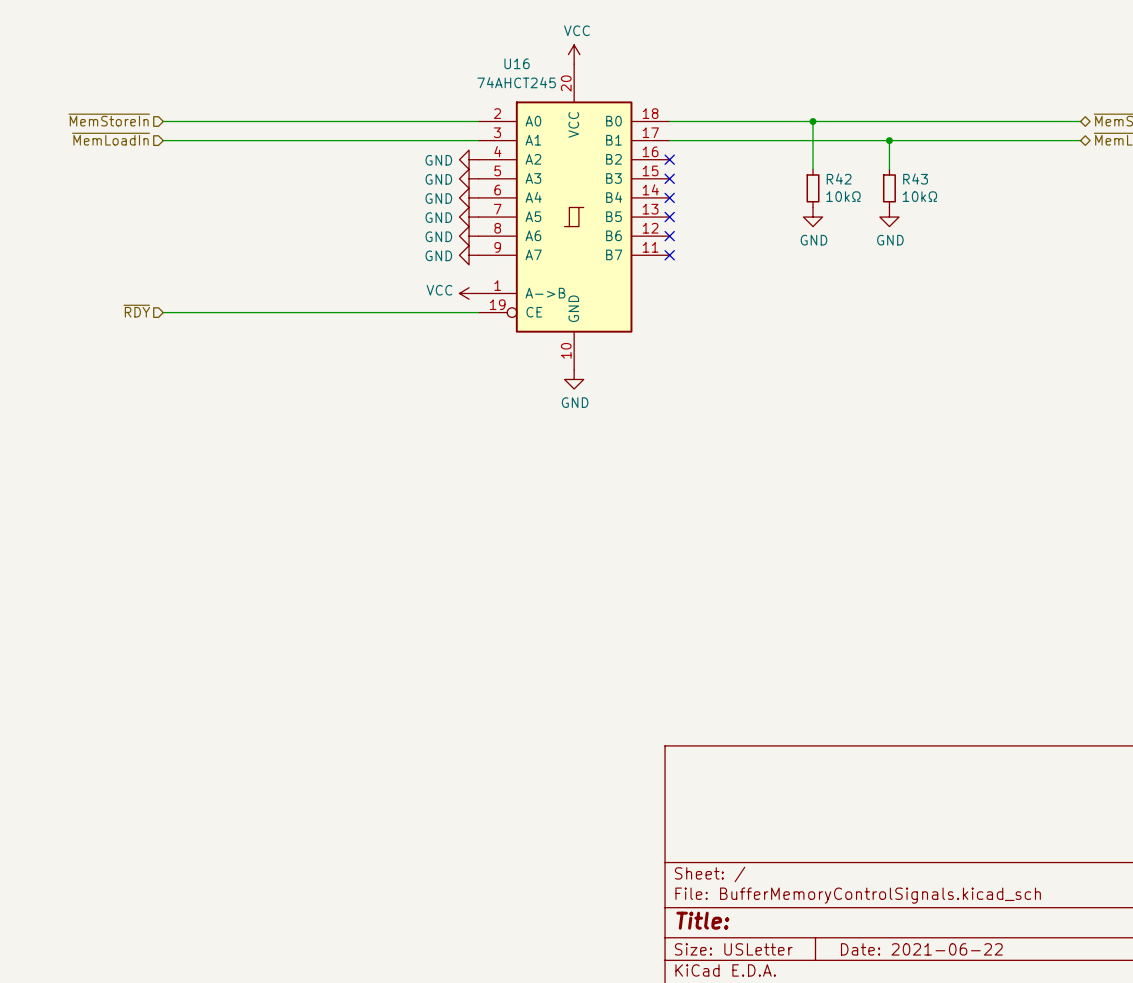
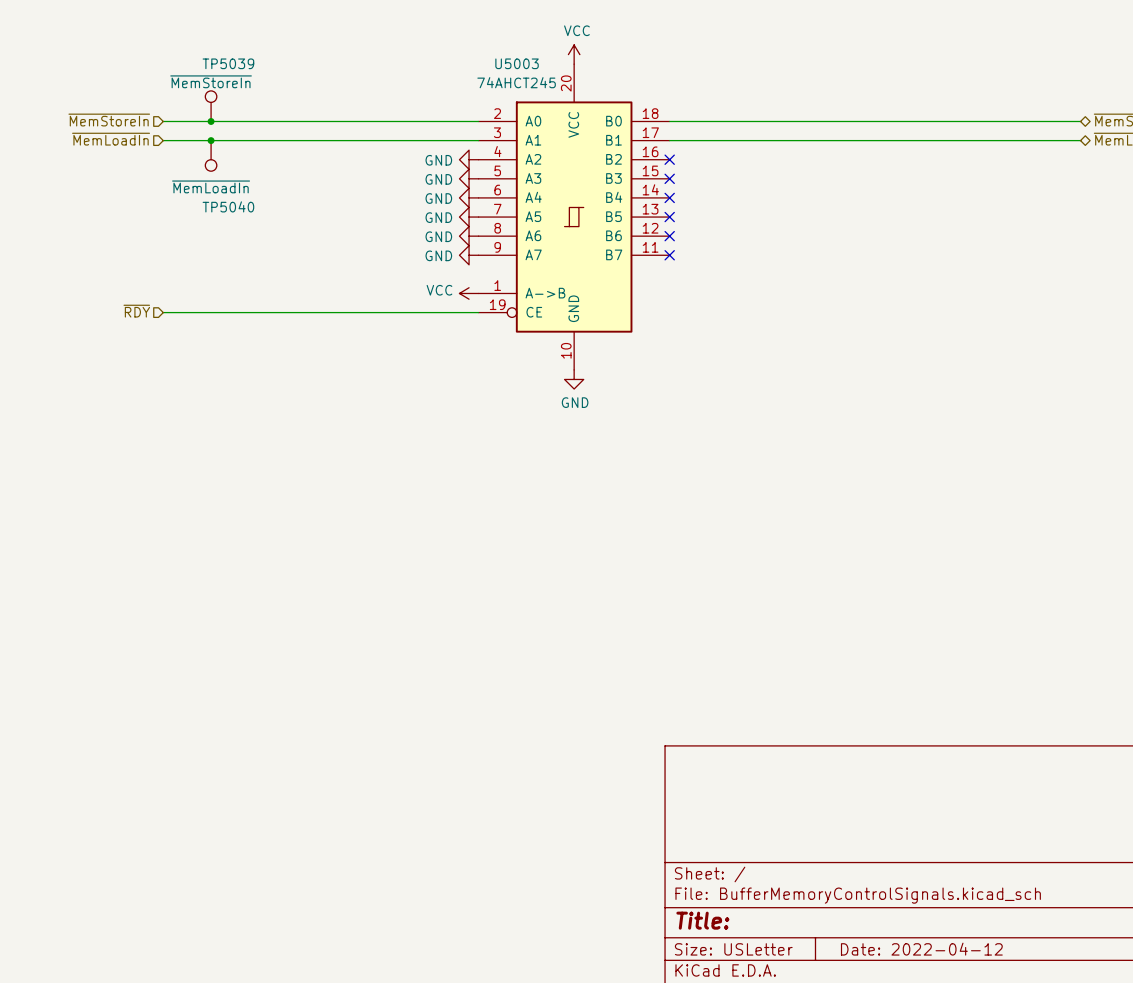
U16 name: U16 (517, 63) -> U5003 (517, 63)
TP5039: none -> ~{MemStoreIn} (211, 106)
junction: none -> (211, 121)
wire: (813, 121) (813, 169) -> none
junction: (813, 121) -> none
junction: none -> (211, 140)
wire: (889, 140) (889, 169) -> none
junction: (889, 140) -> none
TP5040: none -> ~{MemLoadIn} (211, 155)
R42: 10kΩ (813, 188) -> none
R43: 10kΩ (889, 188) -> none
power symbol: GND (813, 217) -> none
power symbol: GND (889, 217) -> none
title block: Date: 2021-06-22 (921, 949) -> Date: 2022-04-12 (921, 949)

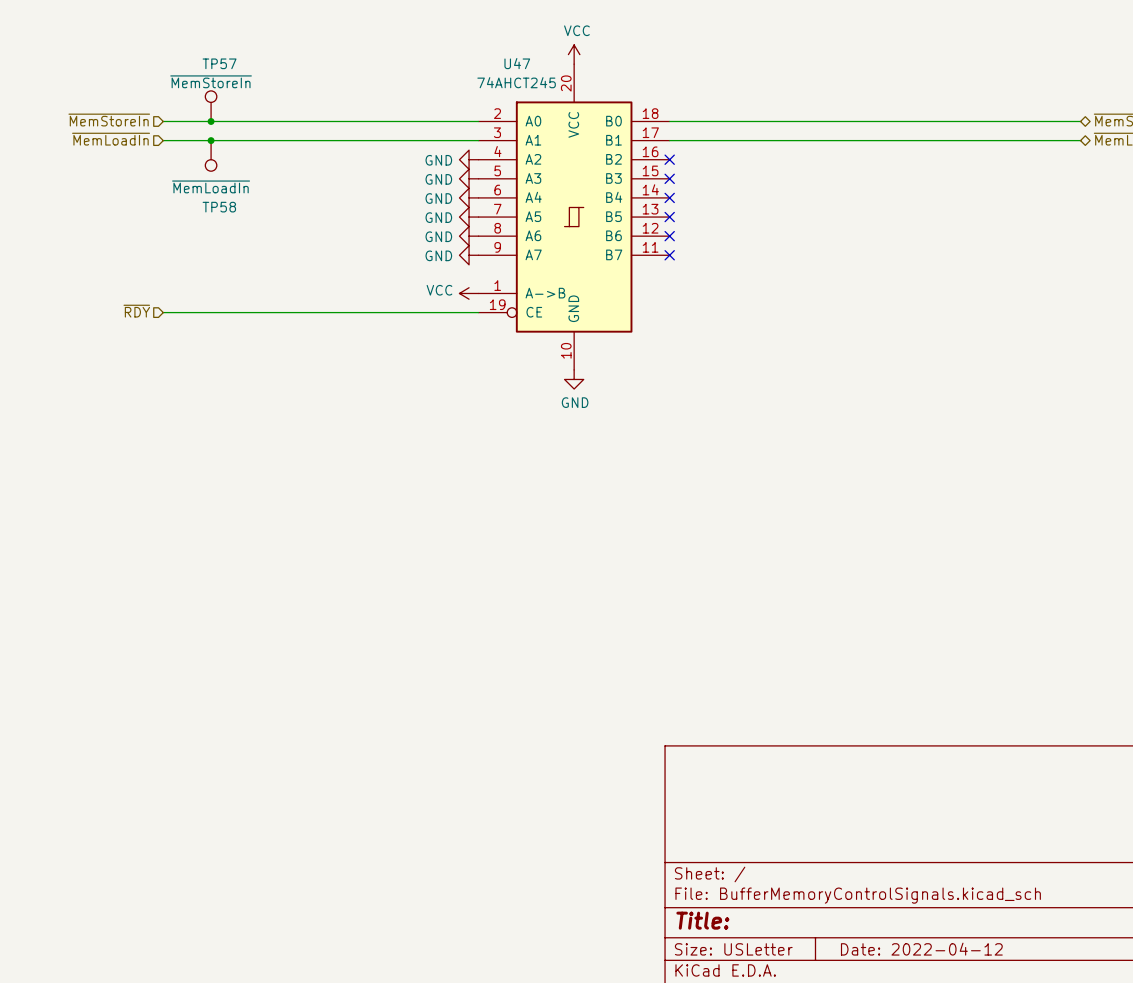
TP5039 name: TP5039 (228, 63) -> TP57 (219, 63)
U5003 name: U5003 (517, 63) -> U47 (517, 63)
TP5040 name: TP5040 (228, 206) -> TP58 (219, 207)

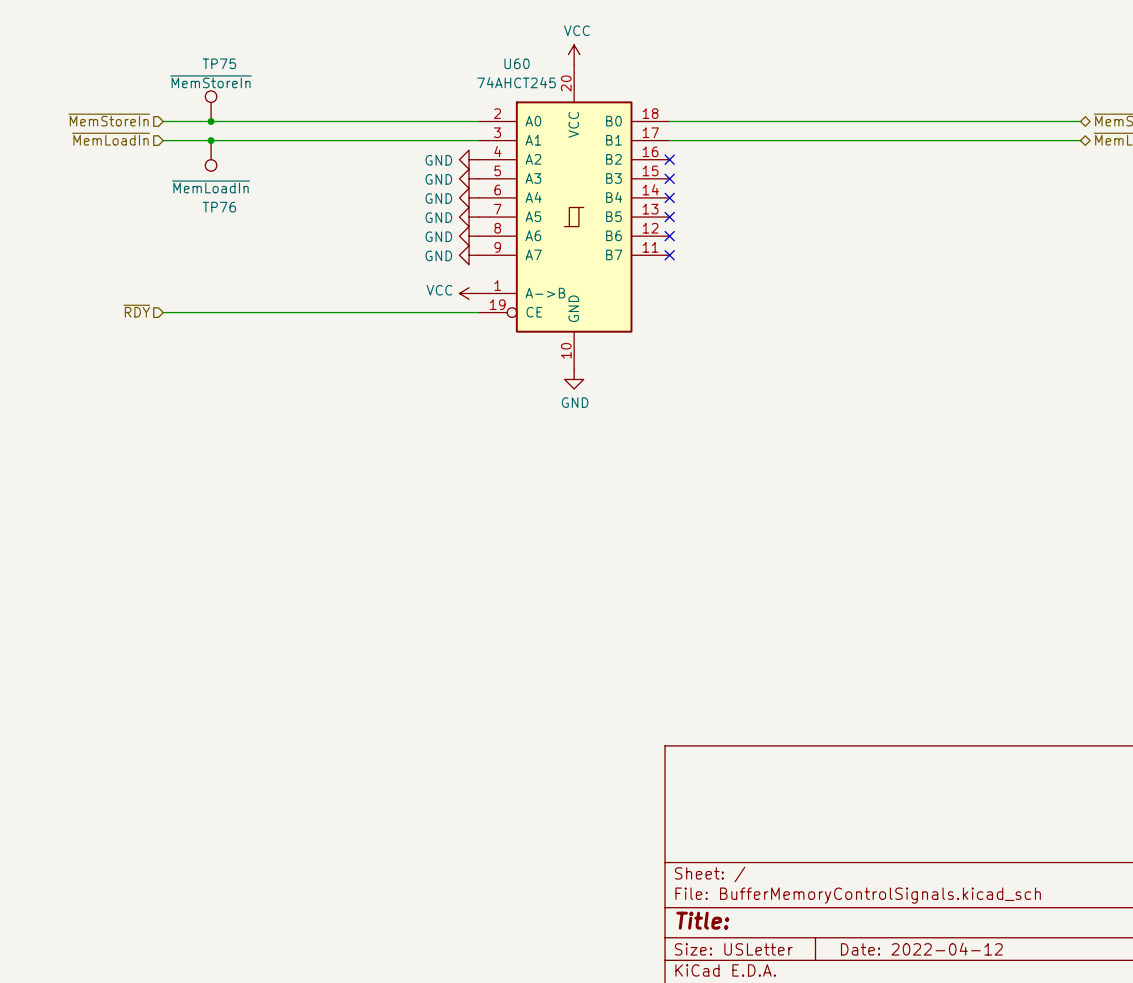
TP57 name: TP57 (219, 63) -> TP75 (219, 63)
U47 name: U47 (517, 63) -> U60 (517, 63)
TP58 name: TP58 (219, 207) -> TP76 (219, 207)

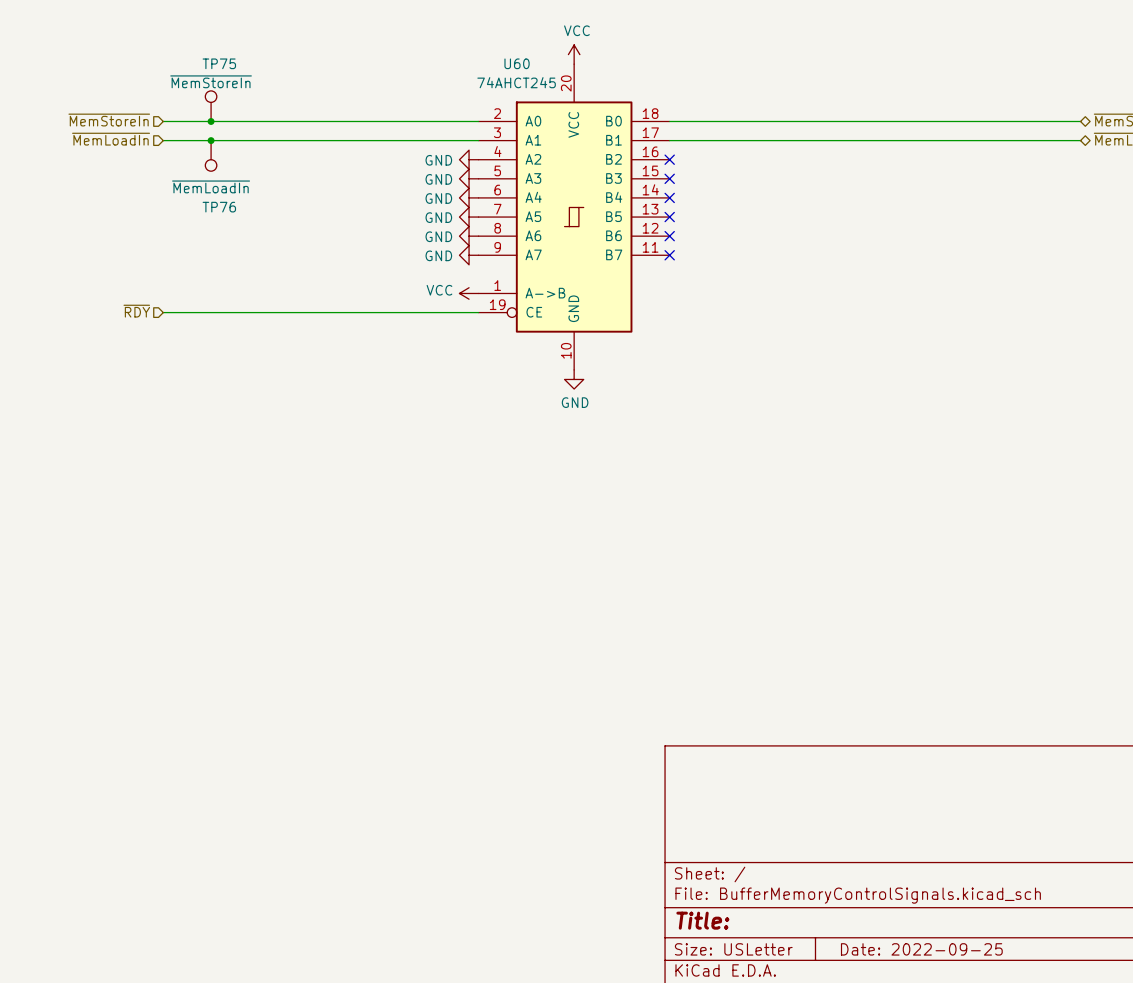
title block: Date: 2022-04-12 (921, 949) -> Date: 2022-09-25 (921, 949)

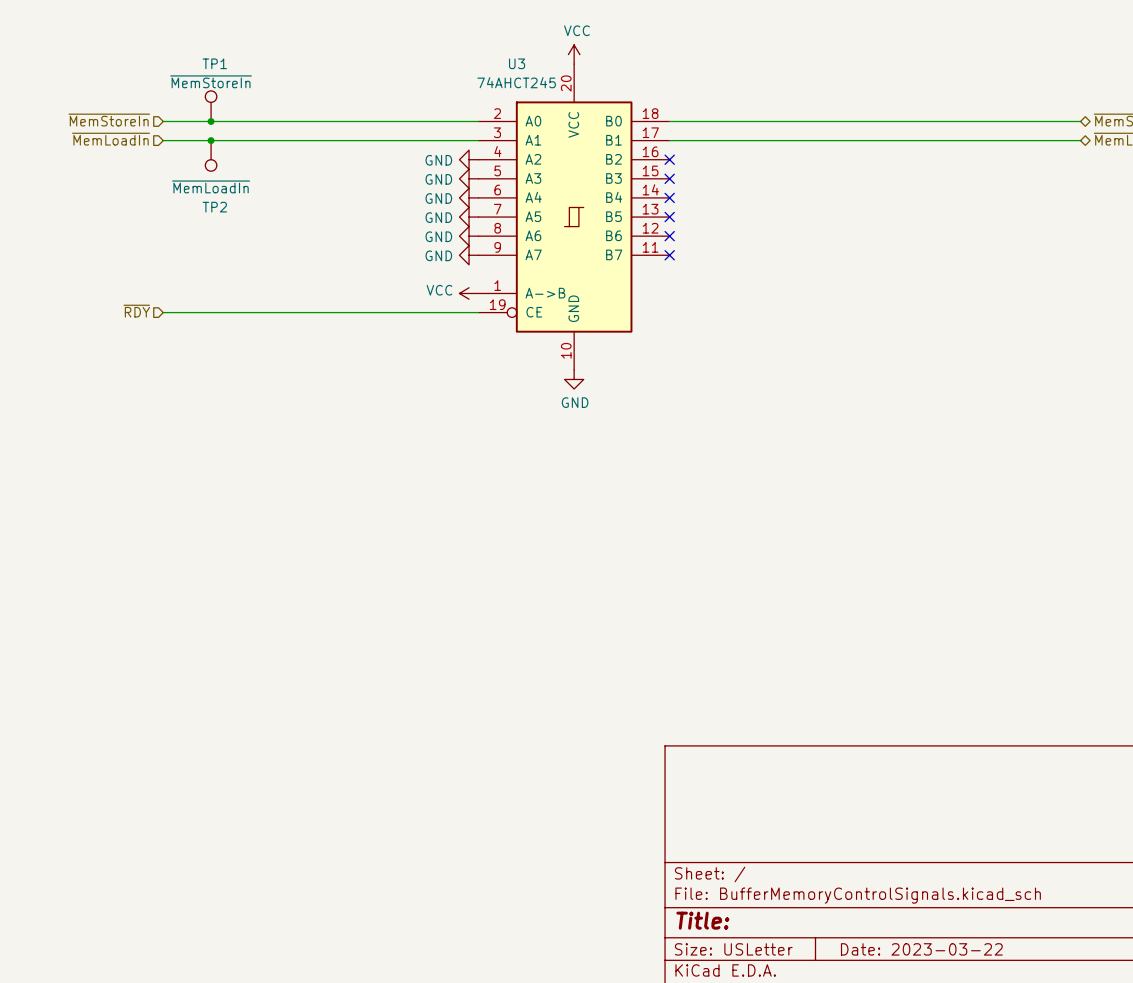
TP75 name: TP75 (219, 63) -> TP1 (214, 63)
U60 name: U60 (517, 63) -> U3 (517, 63)
TP76 name: TP76 (219, 207) -> TP2 (214, 207)
title block: Date: 2022-09-25 (921, 949) -> Date: 2023-03-22 (921, 949)

